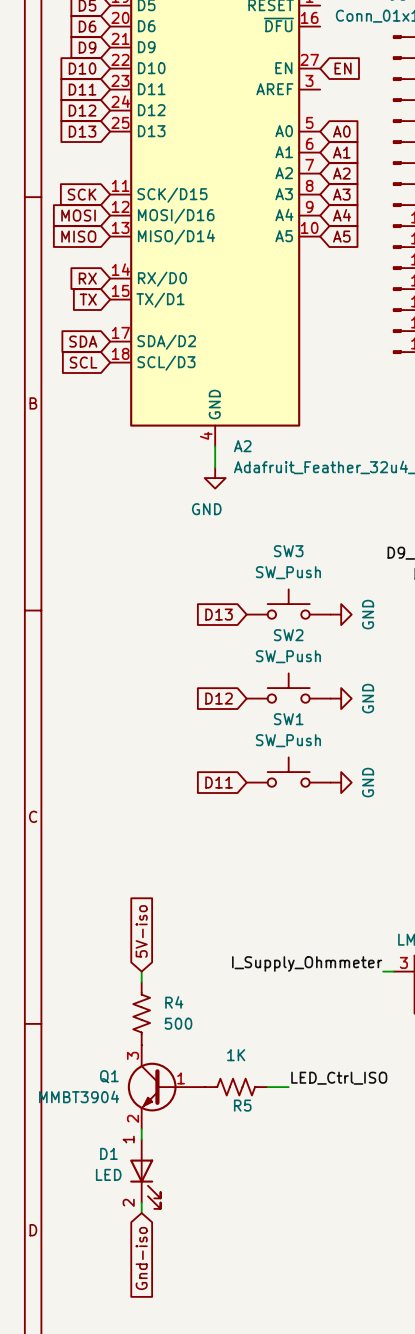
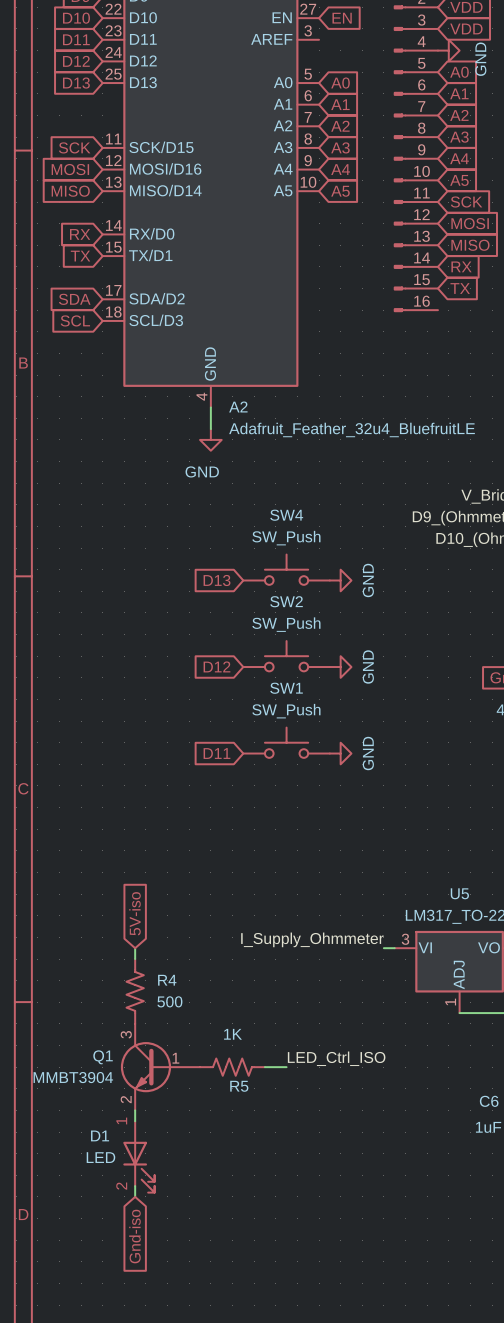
SW3 name: SW3 (288, 551) -> SW4 (286, 515)

